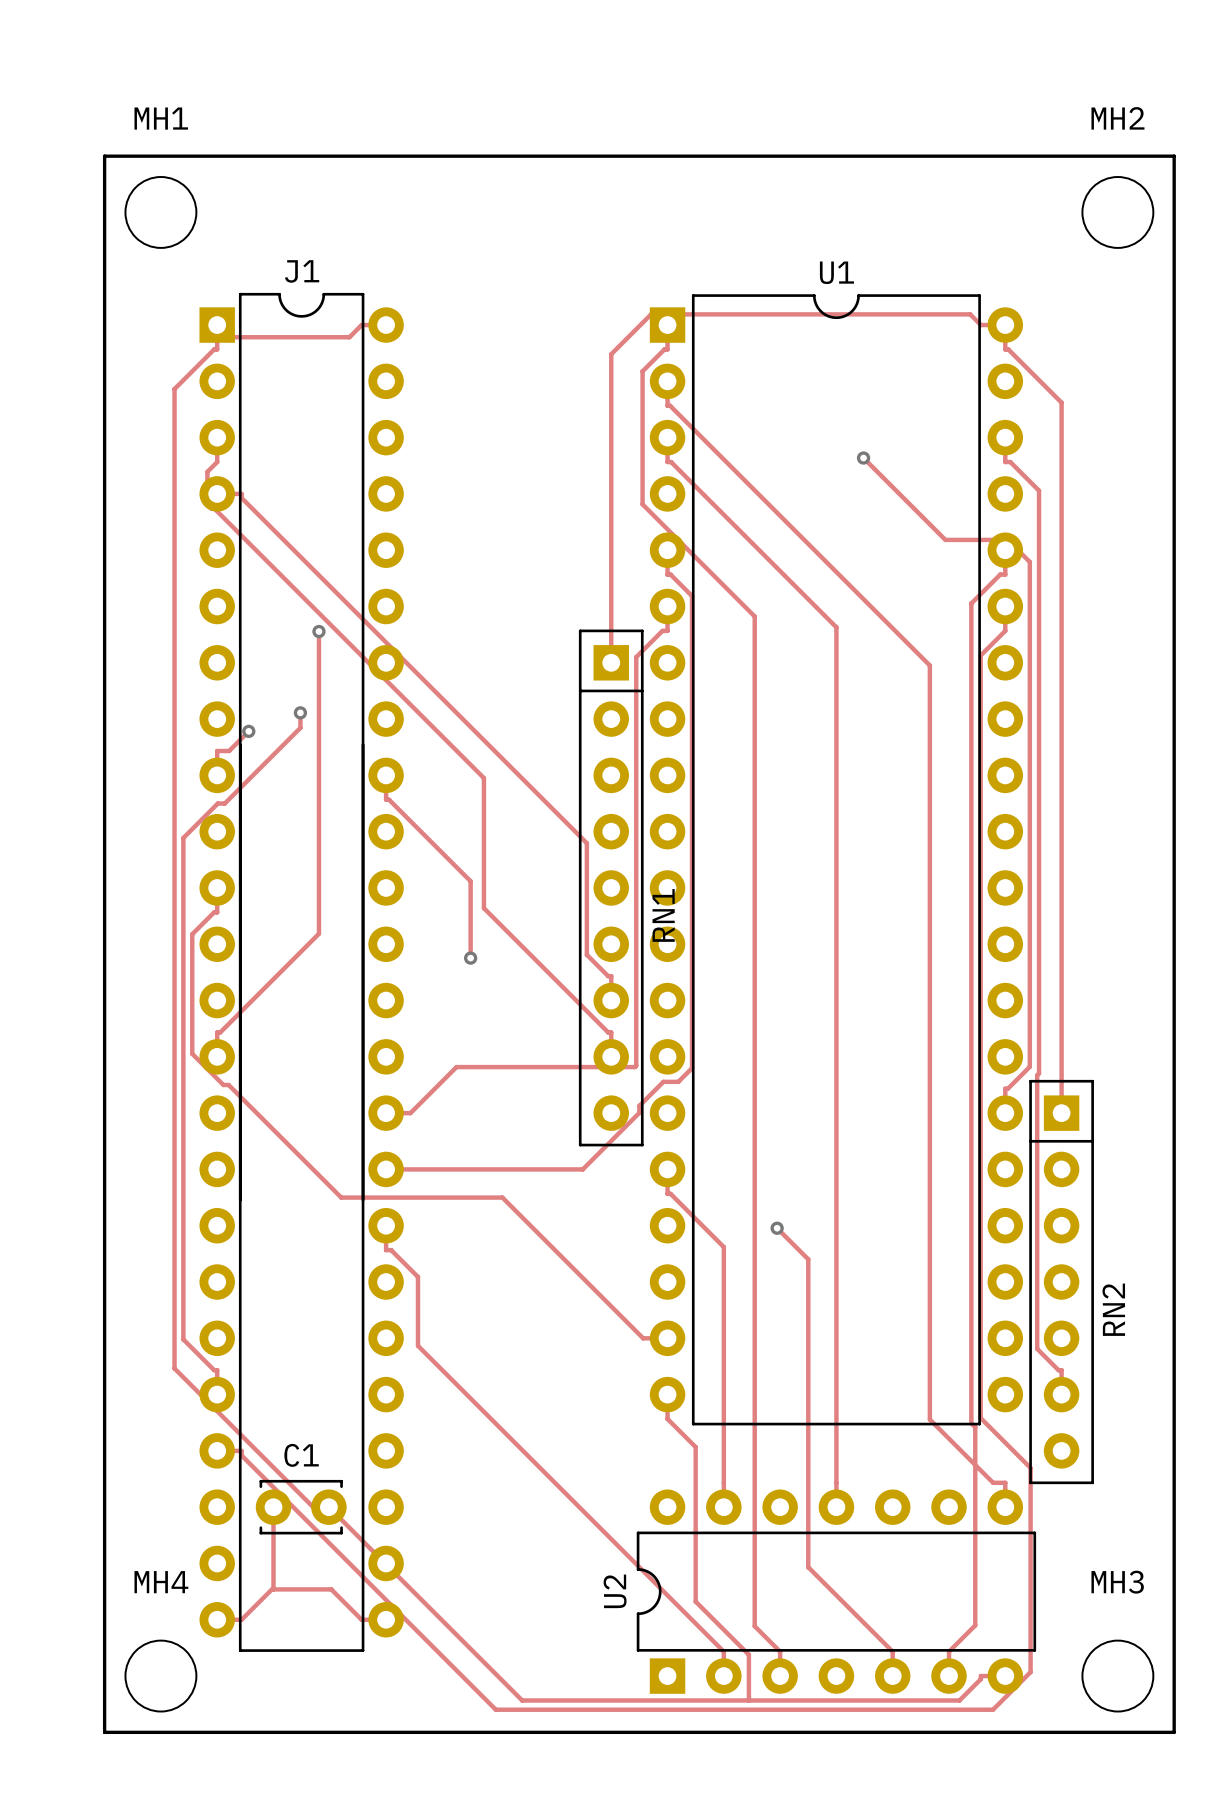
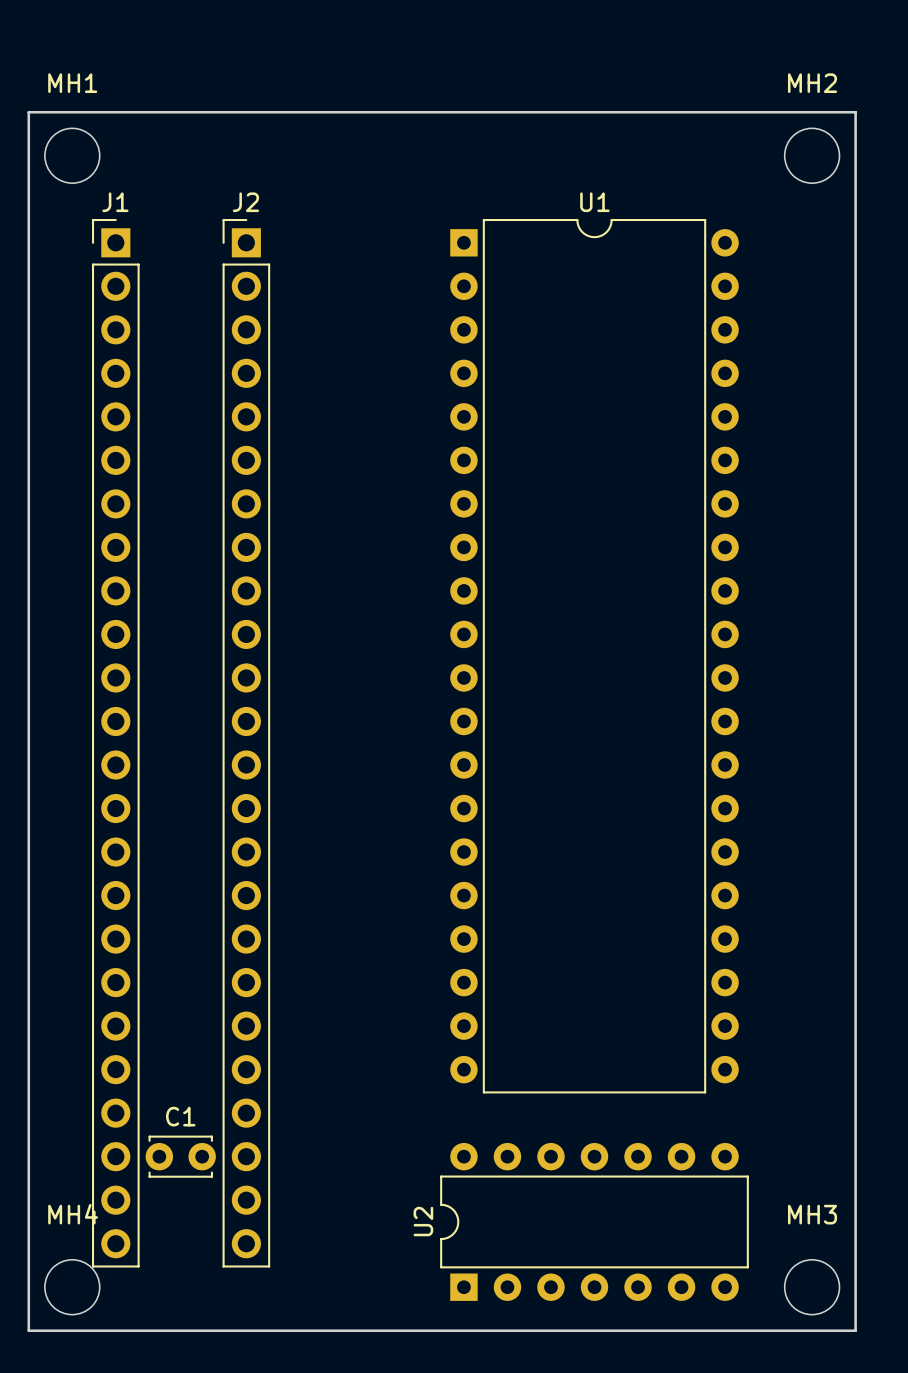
J1 footprint: [199, 292, 404, 1652] -> [92, 218, 140, 1268]
track: (217, 325) (217, 349) (214, 349) (174, 389) (174, 1368) (313, 1507) (328, 1507) (522, 1700) (959, 1700) (980, 1679) (980, 1676) (1005, 1676) -> none
track: (386, 325) (361, 325) (349, 337) (217, 337) -> none
track: (667, 325) (667, 349) (664, 349) (642, 371) (642, 504) (754, 616) (754, 1626) (780, 1651) (780, 1676) -> none
track: (667, 381) (667, 405) (670, 405) (929, 665) (929, 1419) (993, 1482) (1005, 1482) (1005, 1507) -> none
track: (217, 437) (217, 462) (207, 471) (207, 504) (214, 508) (483, 778) (483, 908) (608, 1032) (611, 1032) (611, 1056) -> none
track: (667, 437) (667, 462) (671, 462) (836, 627) (836, 1507) -> none
track: (1005, 437) (1005, 462) (1010, 462) (1039, 490) (1037, 1348) (1058, 1370) (1061, 1370) (1061, 1394) -> none
track: (863, 458) (945, 539) (1007, 539) (1029, 561) (1029, 1066) (1007, 1088) (1005, 1088) (1005, 1113) -> none
via: (863, 458) -> none
track: (217, 493) (241, 493) (241, 497) (586, 843) (586, 954) (608, 976) (611, 976) (611, 1000) -> none
track: (667, 550) (667, 574) (670, 574) (692, 596) (692, 1068) (678, 1081) (663, 1081) (639, 1105) (639, 1112) (582, 1169) (386, 1169) -> none
track: (1005, 550) (1005, 574) (1000, 574) (971, 603) (971, 1423) (975, 1427) (975, 1625) (949, 1651) (949, 1676) -> none
track: (667, 606) (667, 630) (662, 630) (636, 657) (636, 1065) (456, 1067) (410, 1113) (386, 1113) -> none
track: (1005, 606) (1005, 630) (980, 655) (980, 1418) (1030, 1468) (1030, 1672) (993, 1709) (495, 1709) (241, 1455) (241, 1450) (217, 1450) -> none
track: (318, 631) (318, 933) (220, 1032) (217, 1032) (217, 1056) -> none
via: (318, 631) -> none
track: (611, 662) (611, 354) (651, 314) (970, 314) (980, 325) (1005, 325) (1005, 349) (1008, 349) (1061, 402) (1061, 1113) -> none
track: (300, 712) (300, 727) (224, 803) (217, 803) (183, 837) (183, 1339) (214, 1370) (217, 1370) (217, 1394) -> none
via: (300, 712) -> none
track: (248, 731) (229, 751) (217, 751) (217, 775) -> none
via: (248, 731) -> none
track: (386, 775) (386, 799) (389, 799) (470, 881) (470, 958) -> none
track: (217, 887) (217, 912) (214, 912) (192, 934) (192, 1053) (223, 1084) (228, 1084) (341, 1197) (502, 1197) (643, 1338) (667, 1338) -> none
RN1: (611, 887) -> none
via: (470, 958) -> none
J2: none -> (246, 743)
track: (667, 1169) (667, 1193) (670, 1193) (723, 1247) (723, 1507) -> none
track: (386, 1225) (386, 1250) (391, 1250) (417, 1276) (417, 1345) (723, 1651) (723, 1676) -> none
track: (777, 1228) (808, 1259) (808, 1567) (892, 1651) (892, 1676) -> none
via: (777, 1228) -> none
RN2: (1061, 1282) -> none
track: (667, 1394) (667, 1418) (695, 1447) (695, 1601) (748, 1654) (748, 1700) -> none
track: (273, 1507) (273, 1589) -> none
track: (217, 1619) (241, 1619) (271, 1589) (331, 1589) (361, 1619) (386, 1619) -> none

